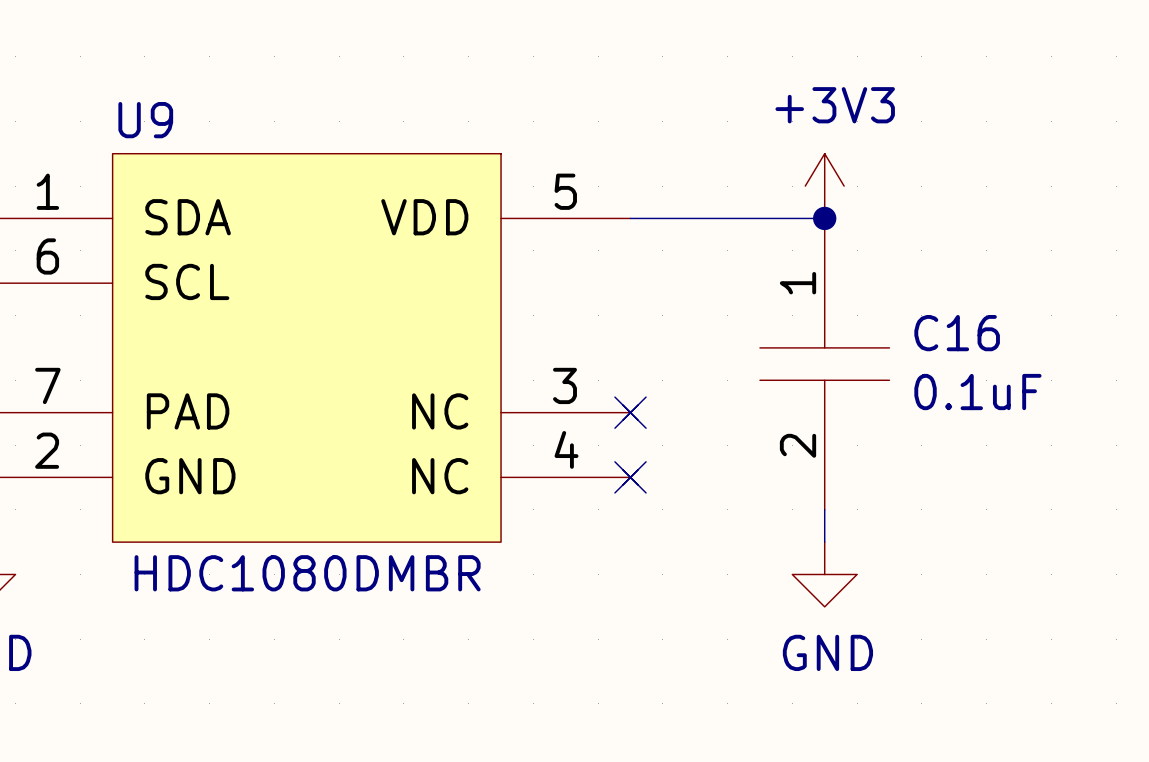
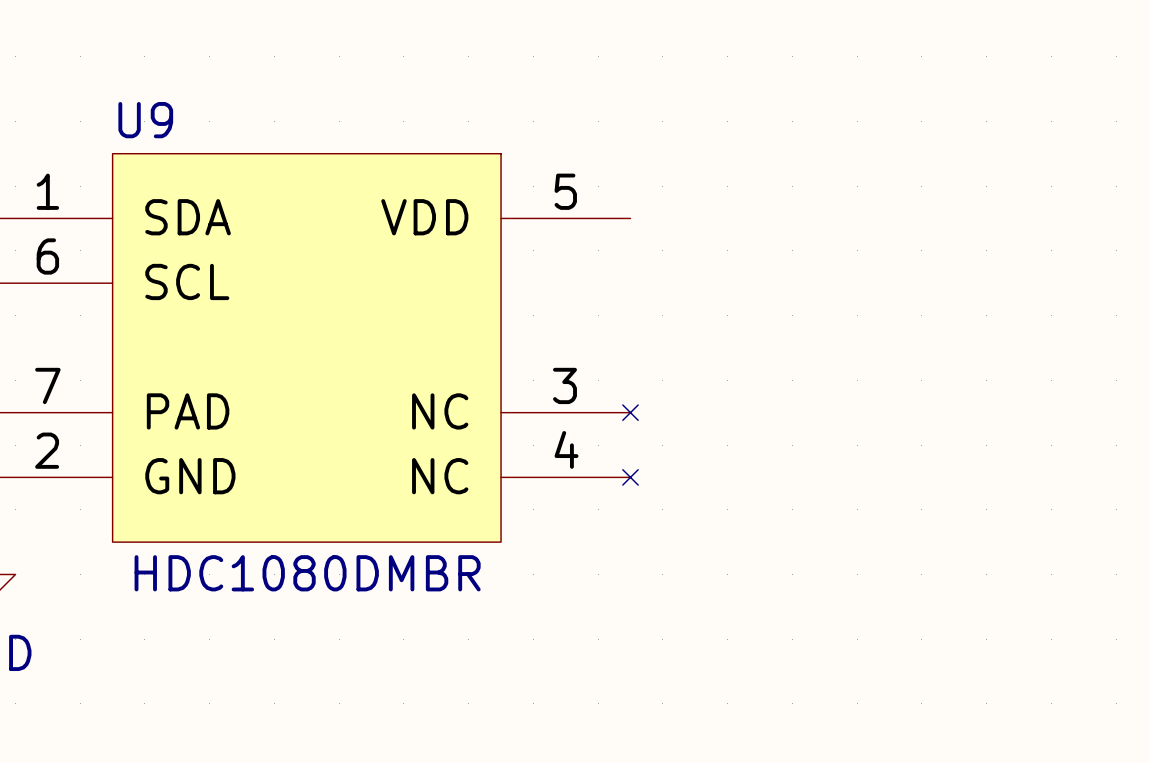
power symbol: +3V3 (824, 186) -> none
wire: (630, 218) (824, 218) -> none
junction: (824, 218) -> none
C16: (824, 364) -> none
no-connect mark: (630, 412) -> none
no-connect mark: (630, 477) -> none
wire: (824, 509) (824, 542) -> none
power symbol: GND (824, 574) -> none

